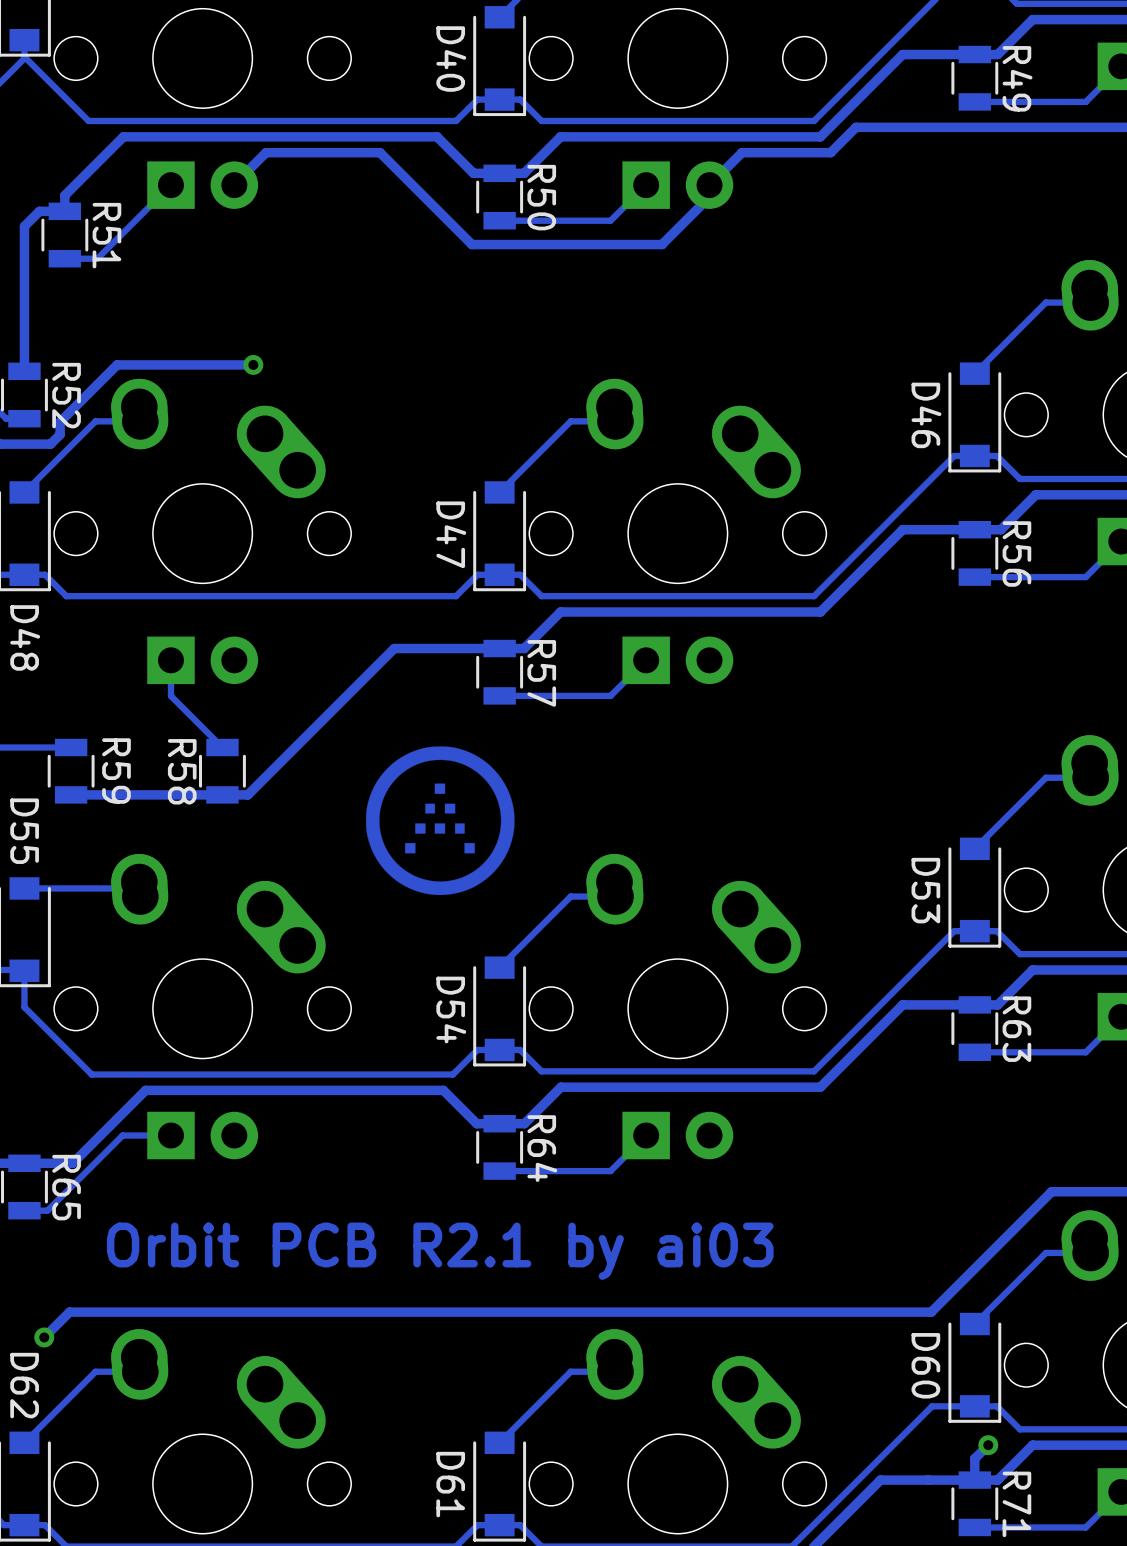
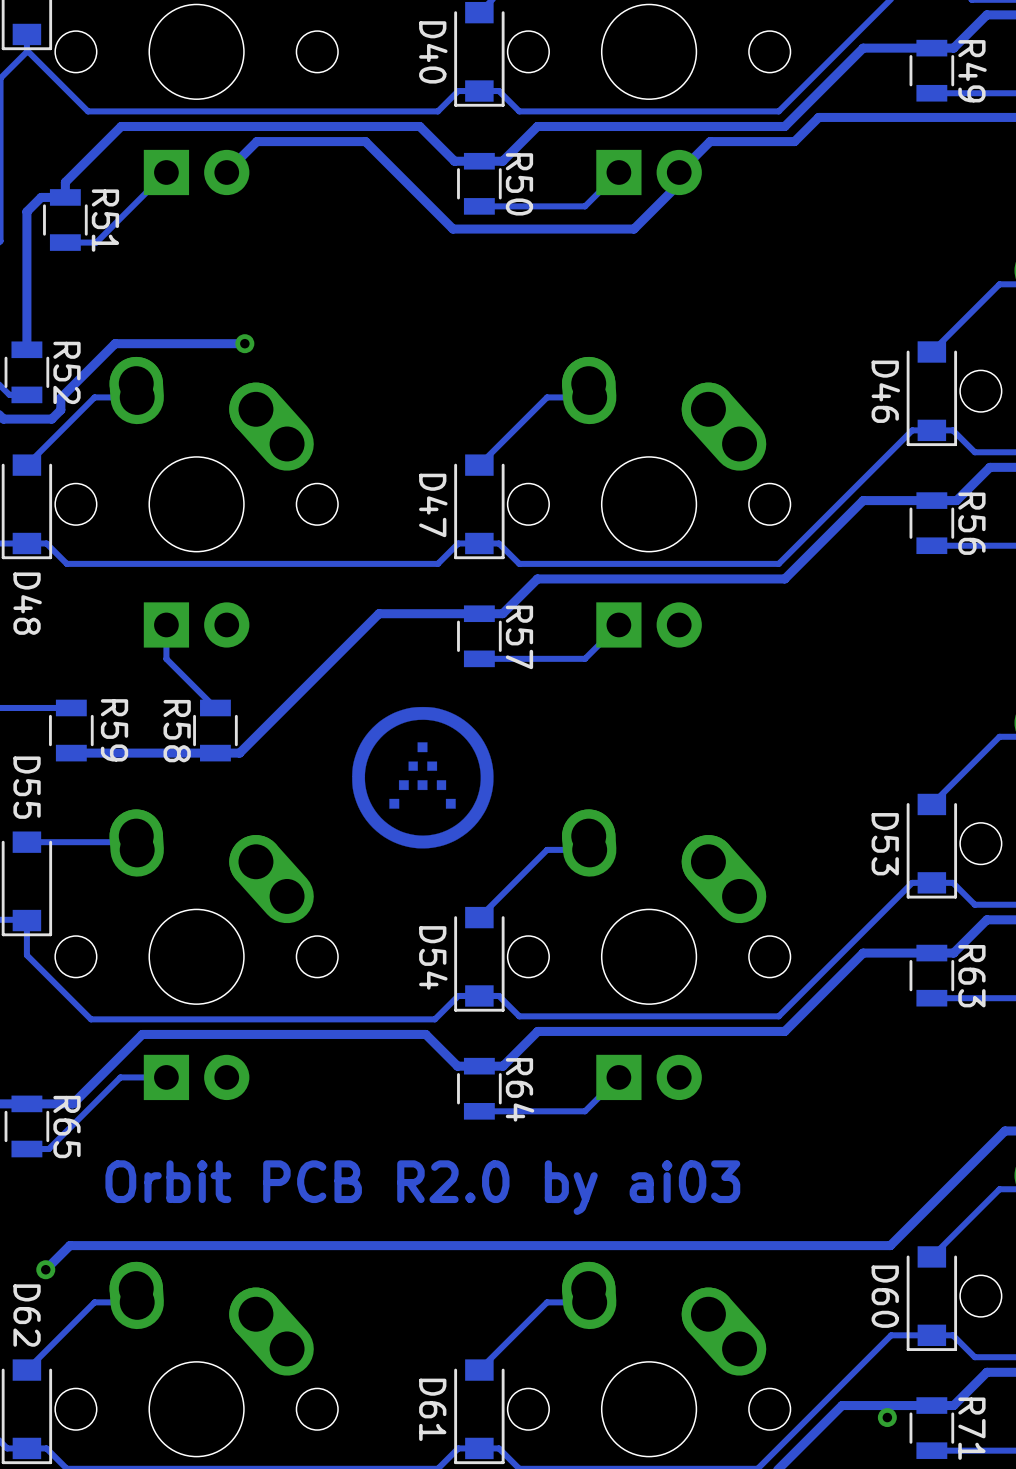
text: Orbit PCB R2.1 by ai03 (440, 1251) -> Orbit PCB R2.0 by ai03 (422, 1187)
track: (988, 1445) (974, 1458) (974, 1480) -> none
via position: (988, 1445) -> (887, 1417)

